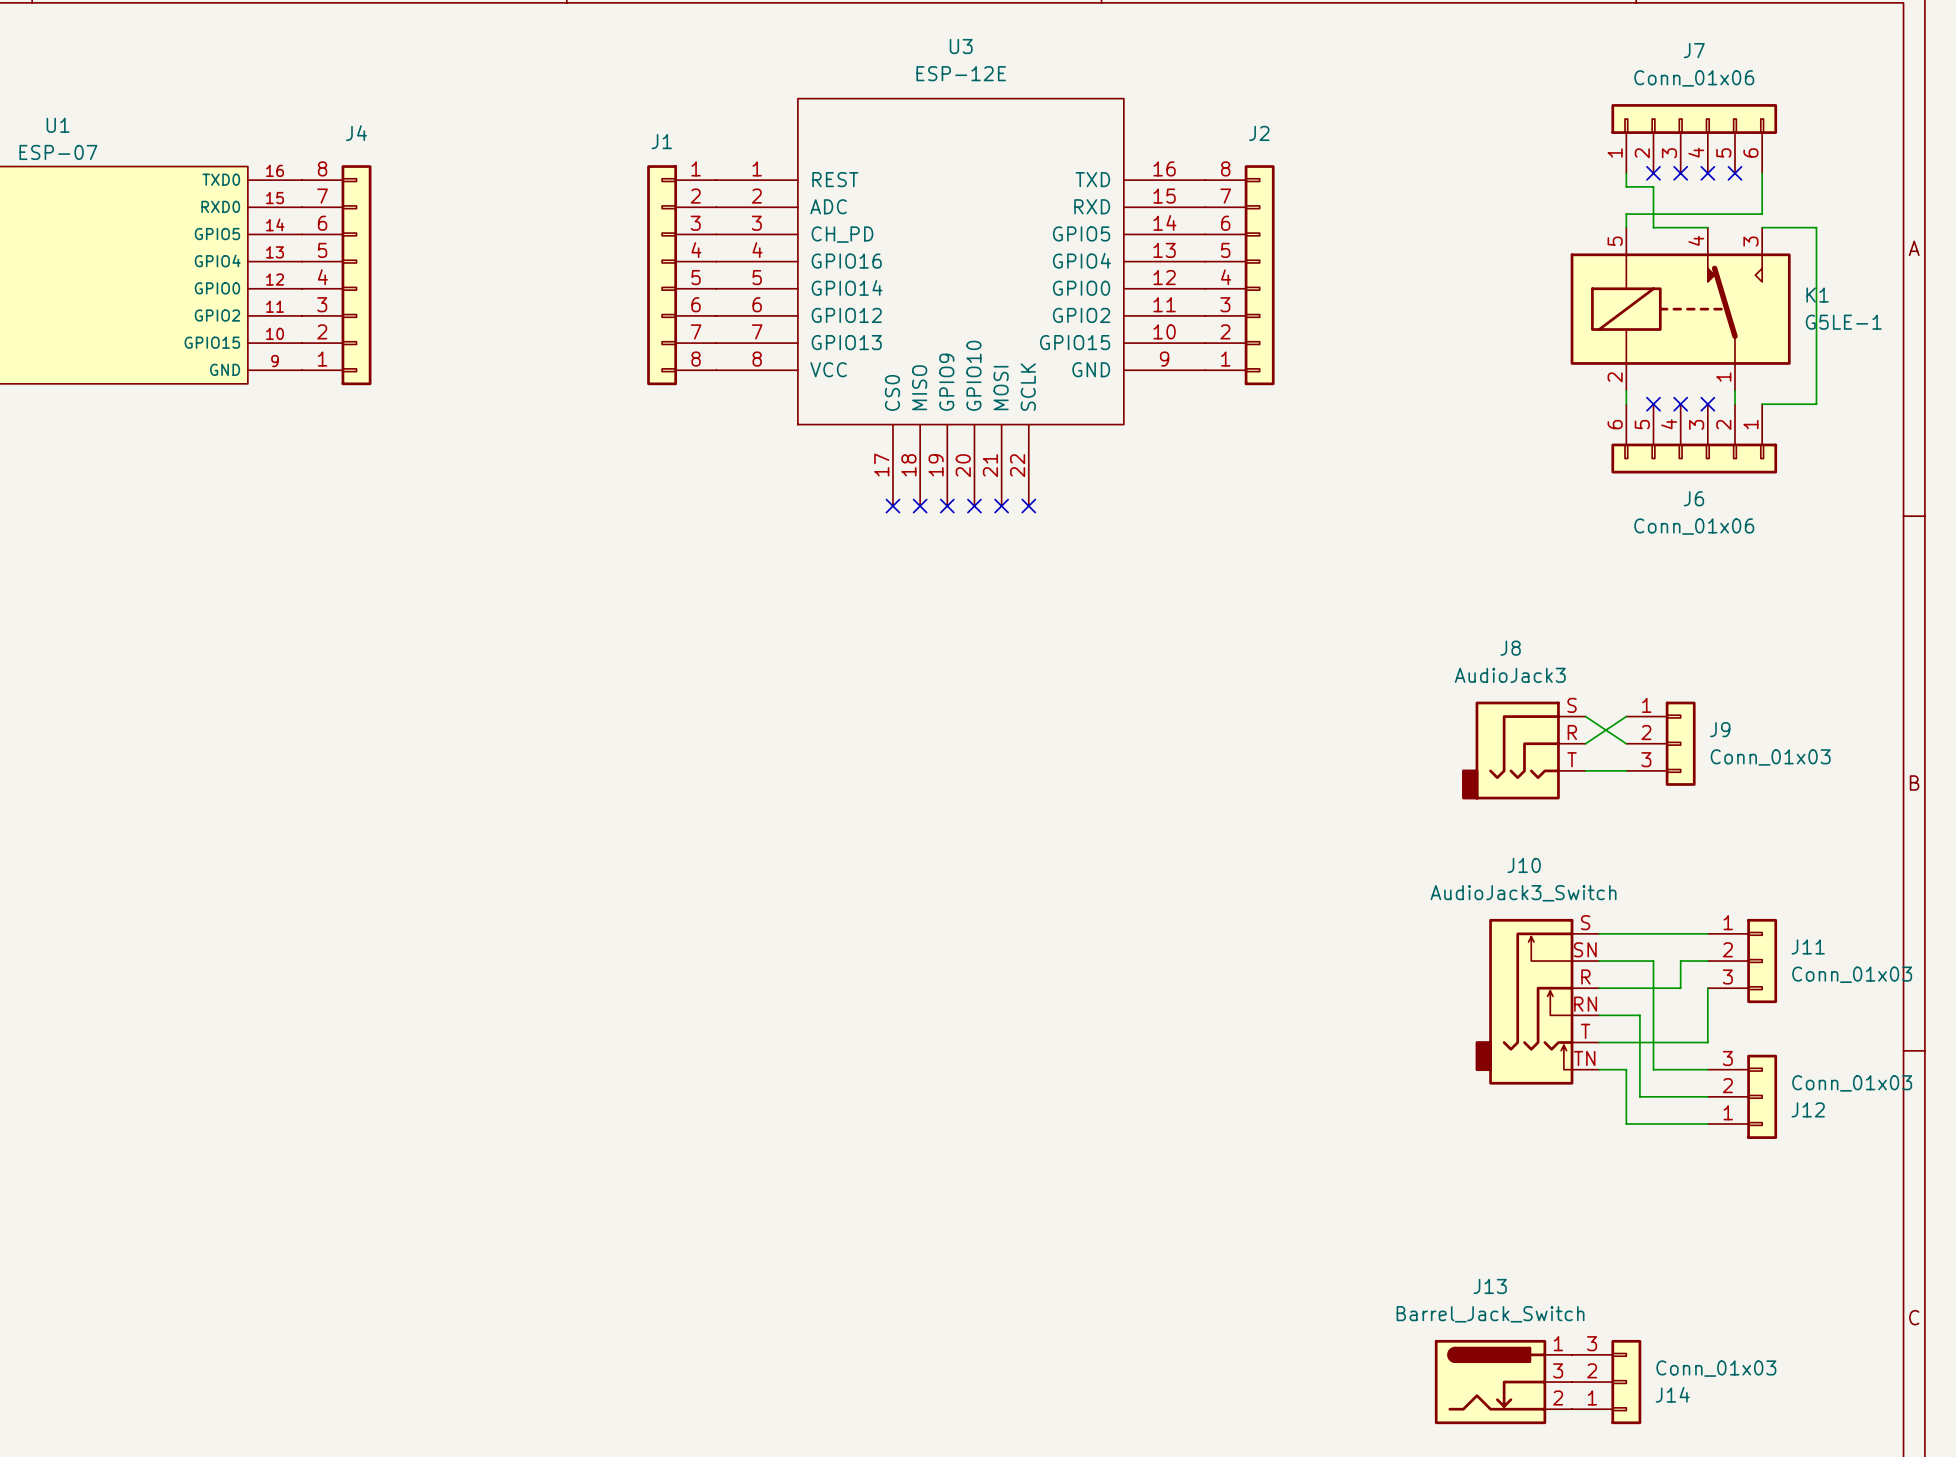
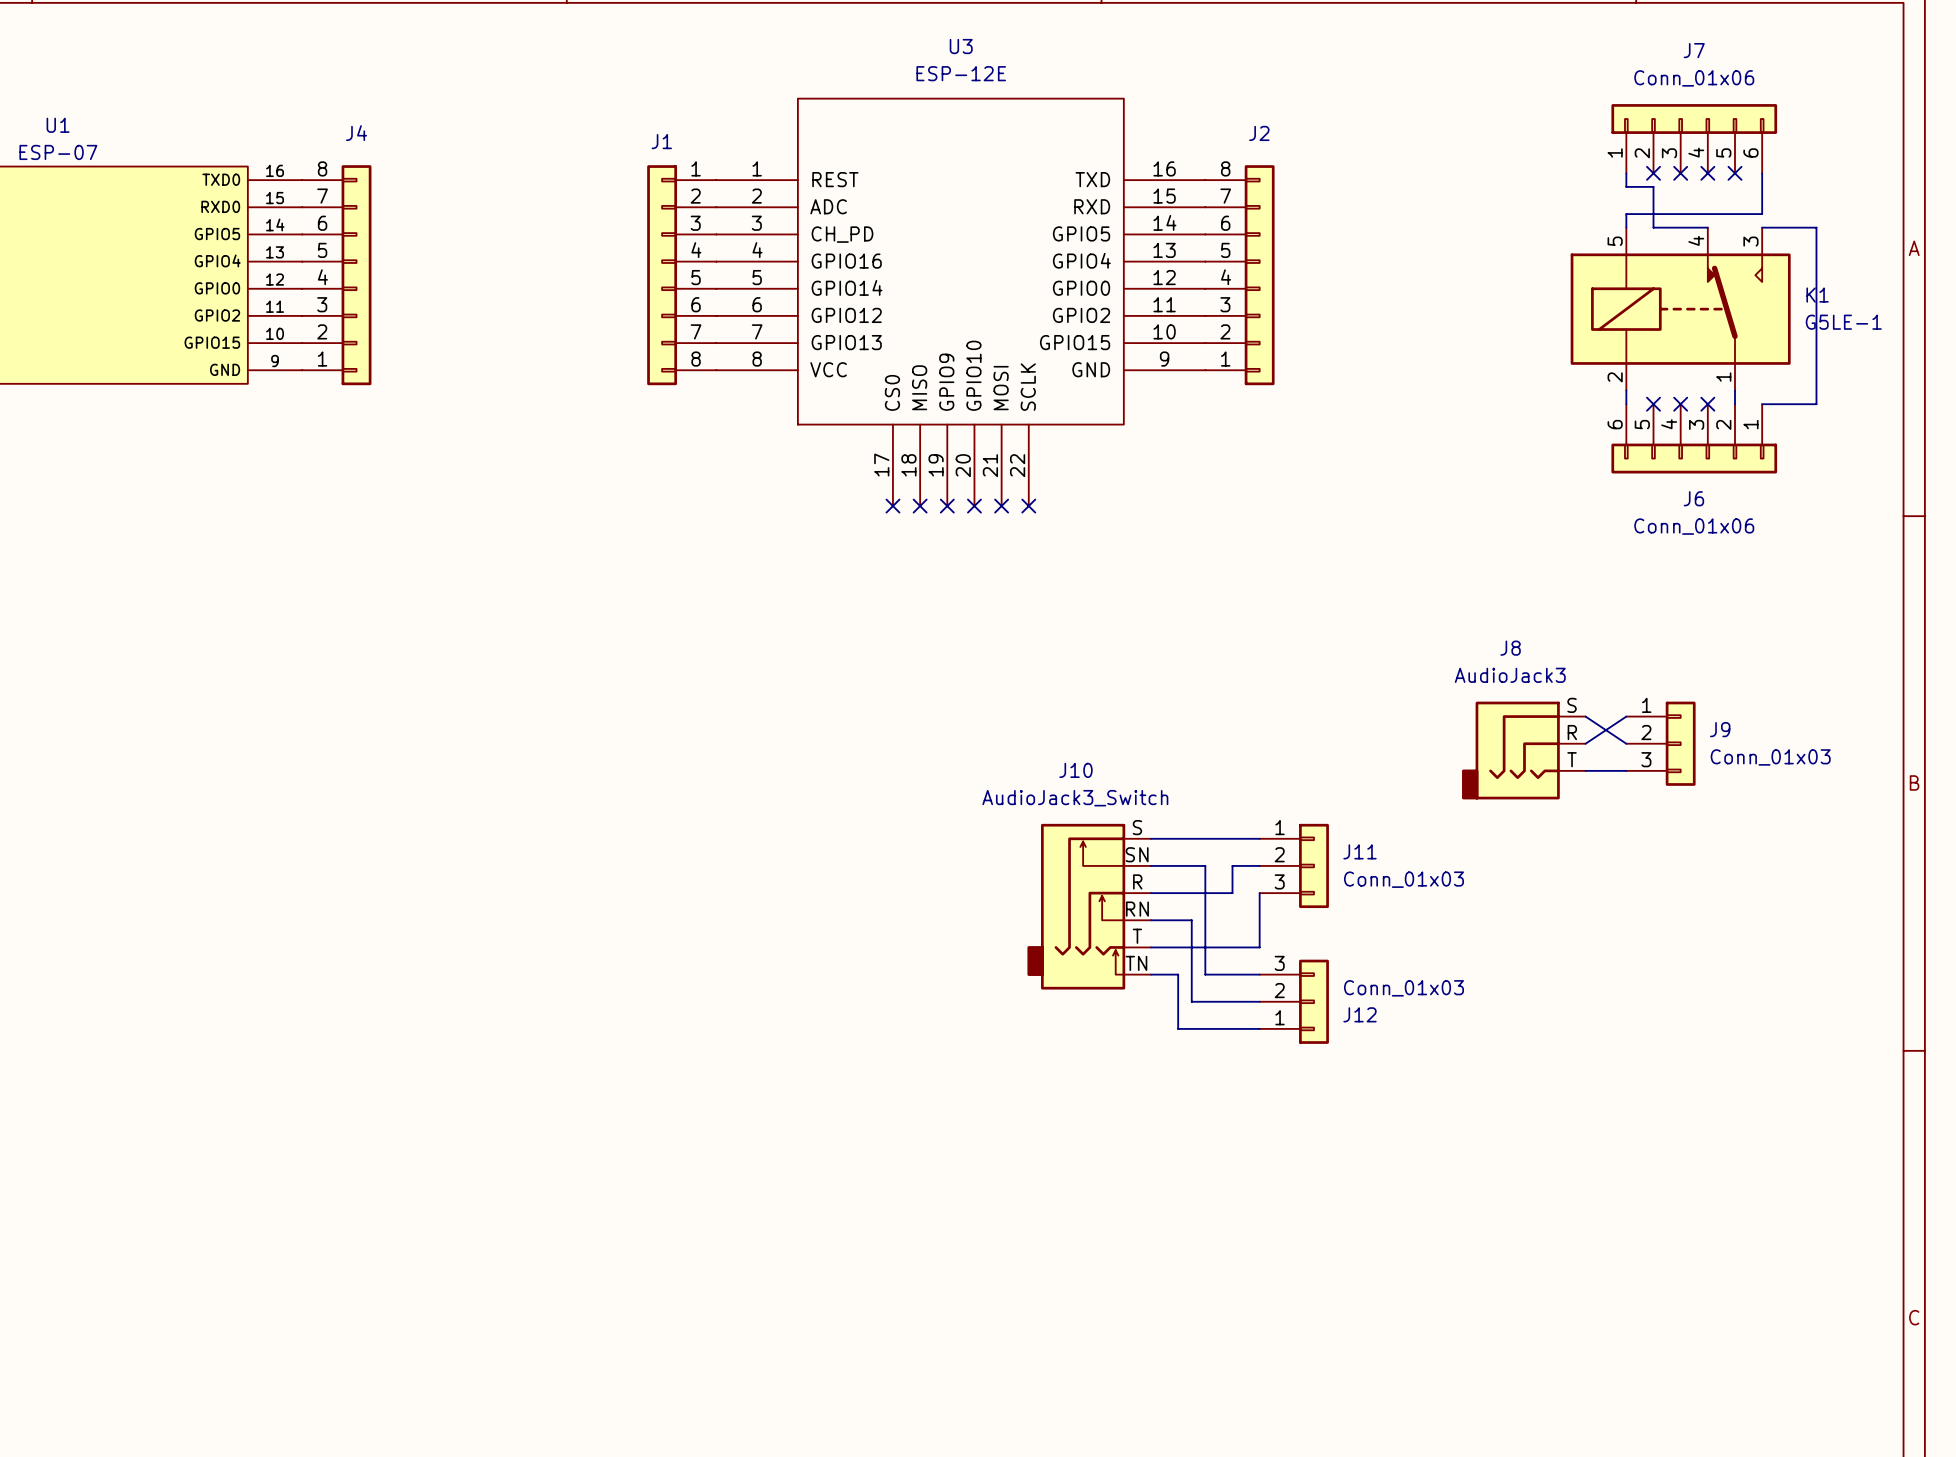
wire: none -> (1151, 838) (1259, 838)
wire: none -> (1151, 865) (1205, 865) (1205, 974) (1259, 974)
wire: none -> (1259, 865) (1232, 865) (1232, 893) (1151, 893)
wire: none -> (1259, 893) (1259, 947) (1151, 947)
wire: none -> (1151, 920) (1191, 920) (1191, 1001) (1259, 1001)
wire: (1599, 933) (1707, 933) -> none
wire: (1599, 961) (1653, 961) (1653, 1069) (1707, 1069) -> none
wire: (1707, 961) (1680, 961) (1680, 988) (1599, 988) -> none
J11 position: (1742, 961) -> (1294, 865)
wire: none -> (1151, 974) (1178, 974) (1178, 1028) (1259, 1028)
wire: (1707, 988) (1707, 1042) (1599, 1042) -> none
J10 position: (1537, 1001) -> (1089, 906)
wire: (1599, 1015) (1639, 1015) (1639, 1096) (1707, 1096) -> none
wire: (1599, 1069) (1626, 1069) (1626, 1124) (1707, 1124) -> none
J12 position: (1742, 1096) -> (1294, 1001)
J13: Barrel_Jack_Switch (1503, 1382) -> none
J14: Conn_01x03 (1606, 1382) -> none

